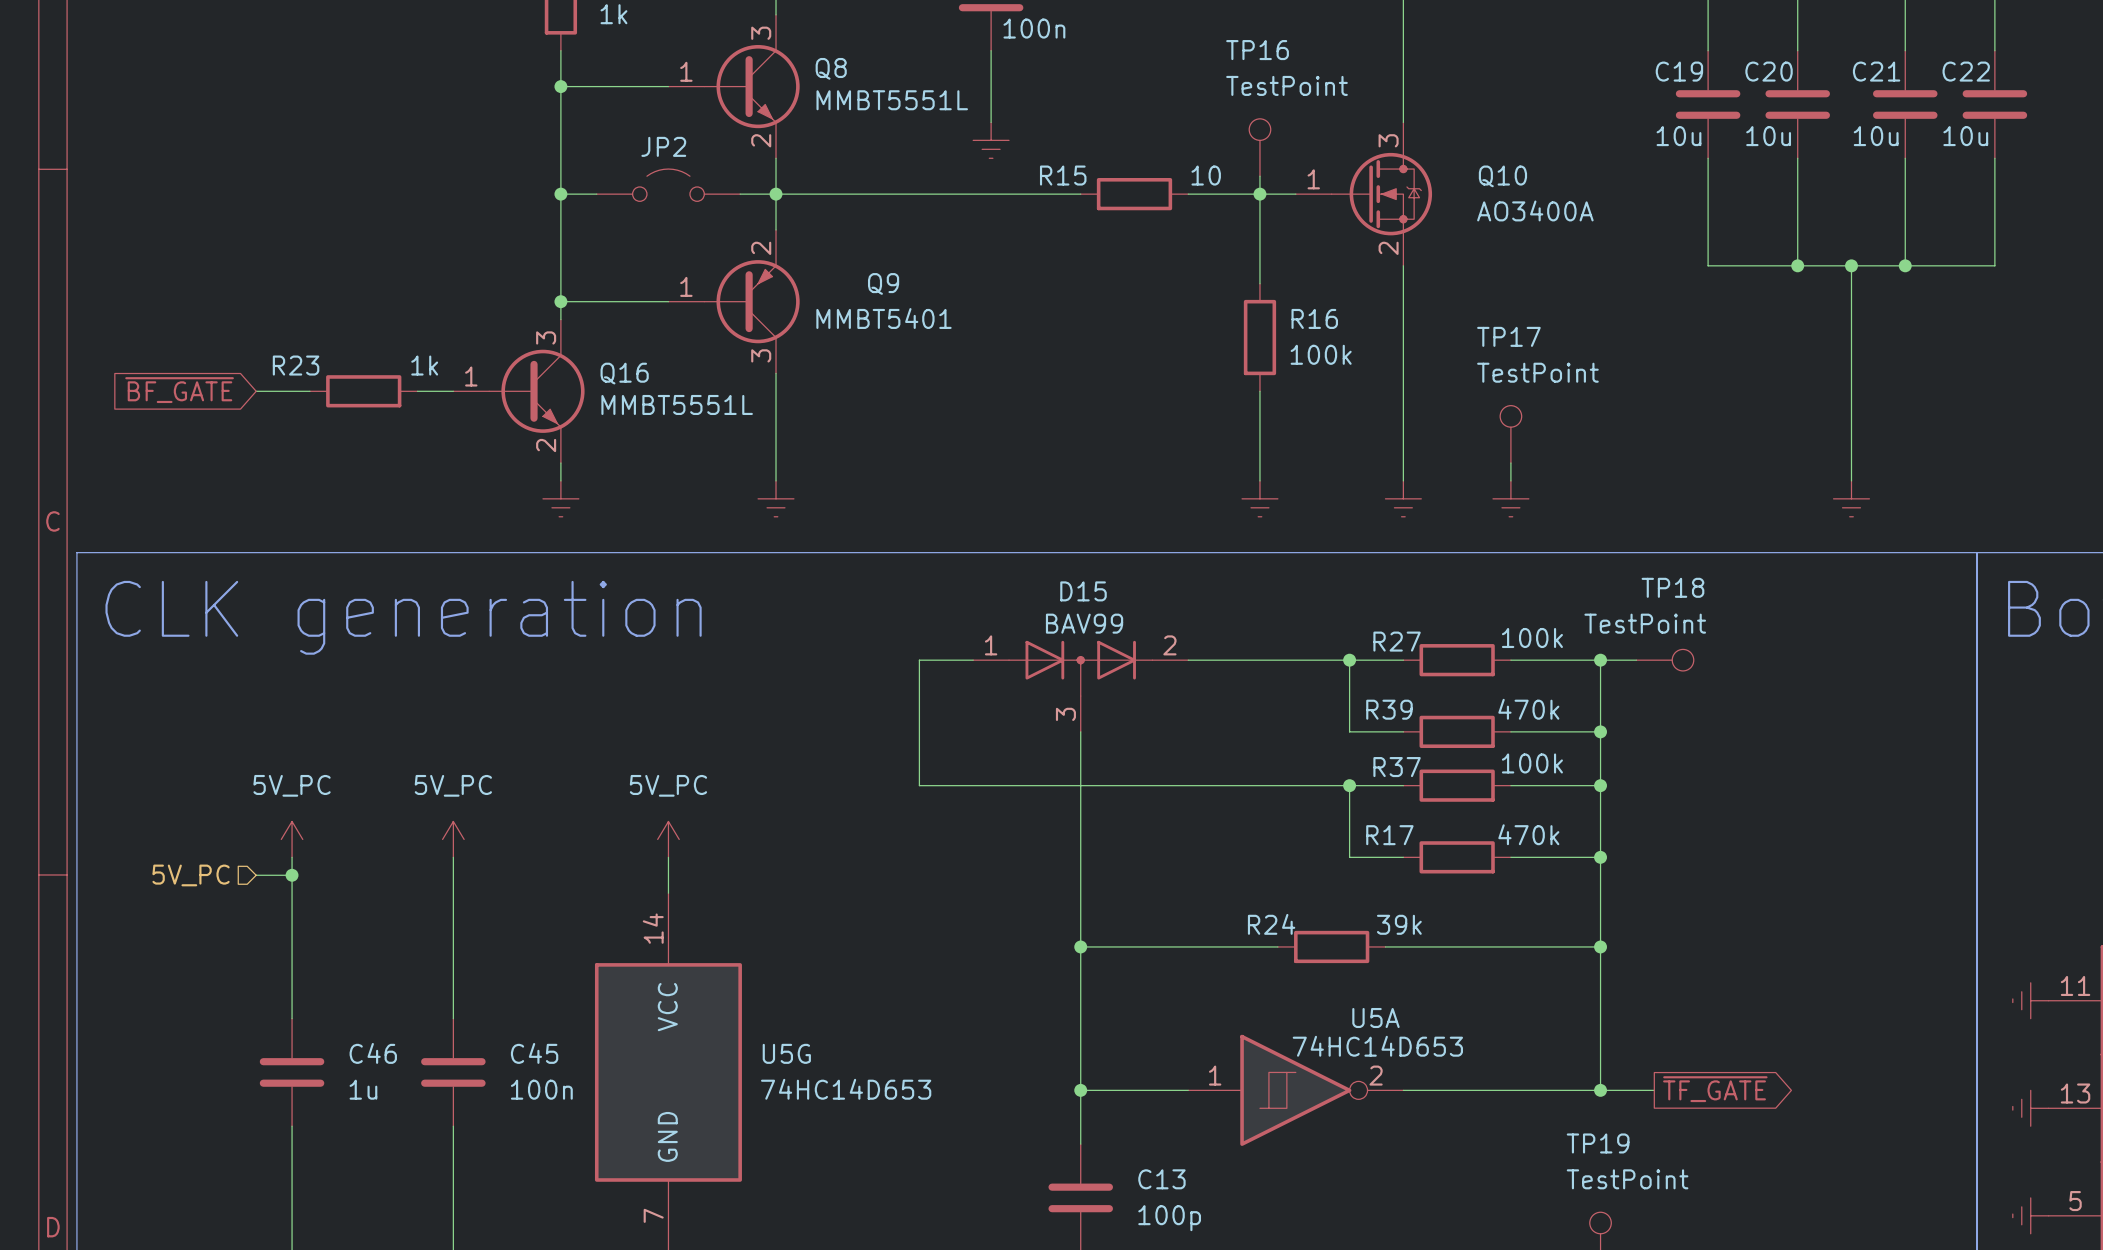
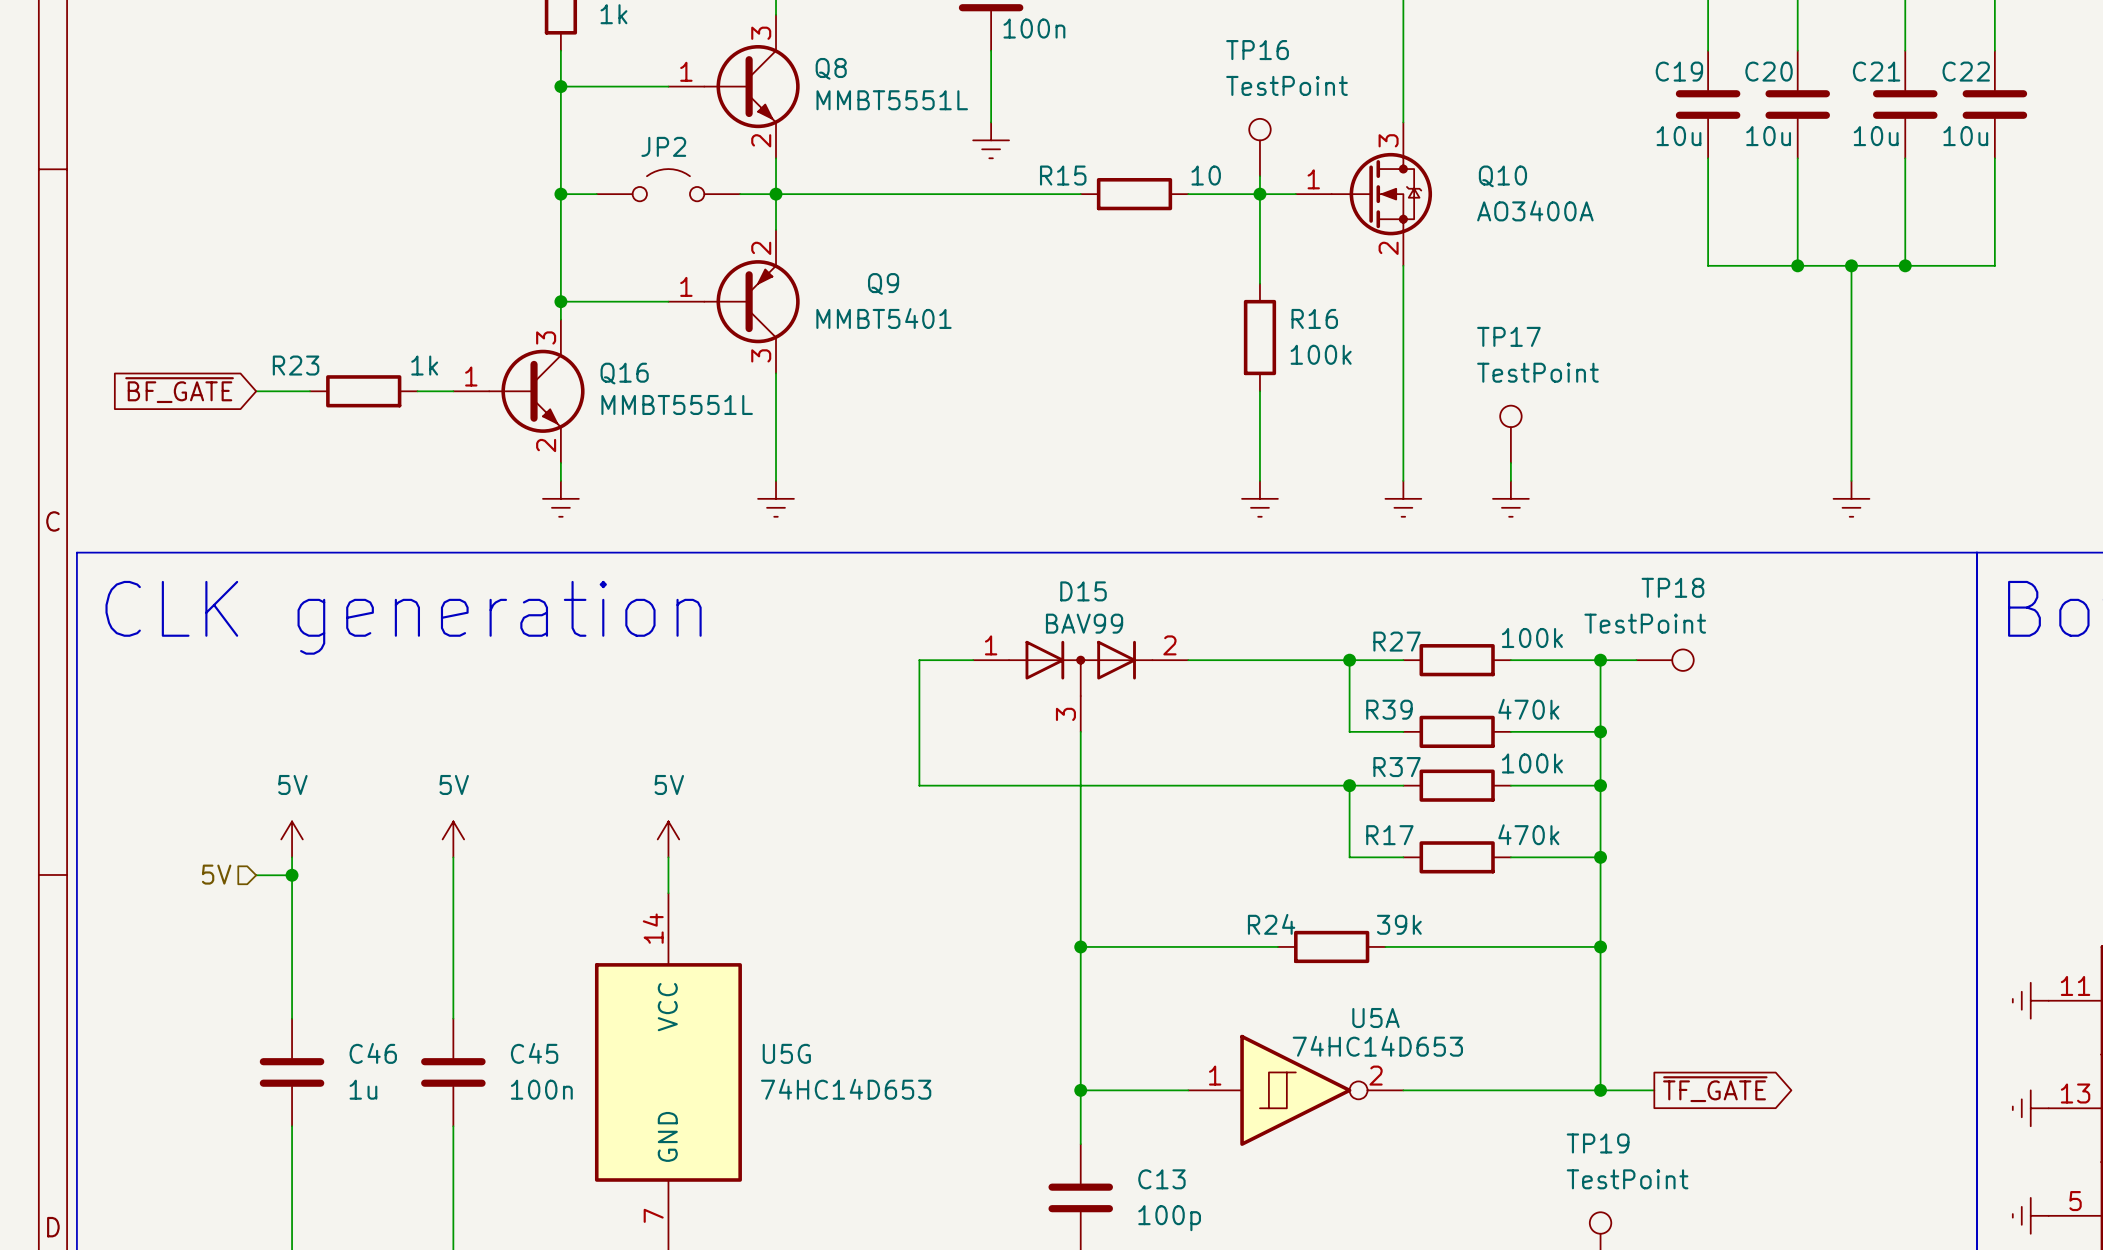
power symbol: 5V_PC (292, 839) -> 5V (292, 839)
power symbol: 5V_PC (453, 839) -> 5V (453, 839)
power symbol: 5V_PC (668, 839) -> 5V (668, 839)
hierarchical label: 5V_PC (191, 875) -> 5V (216, 874)

